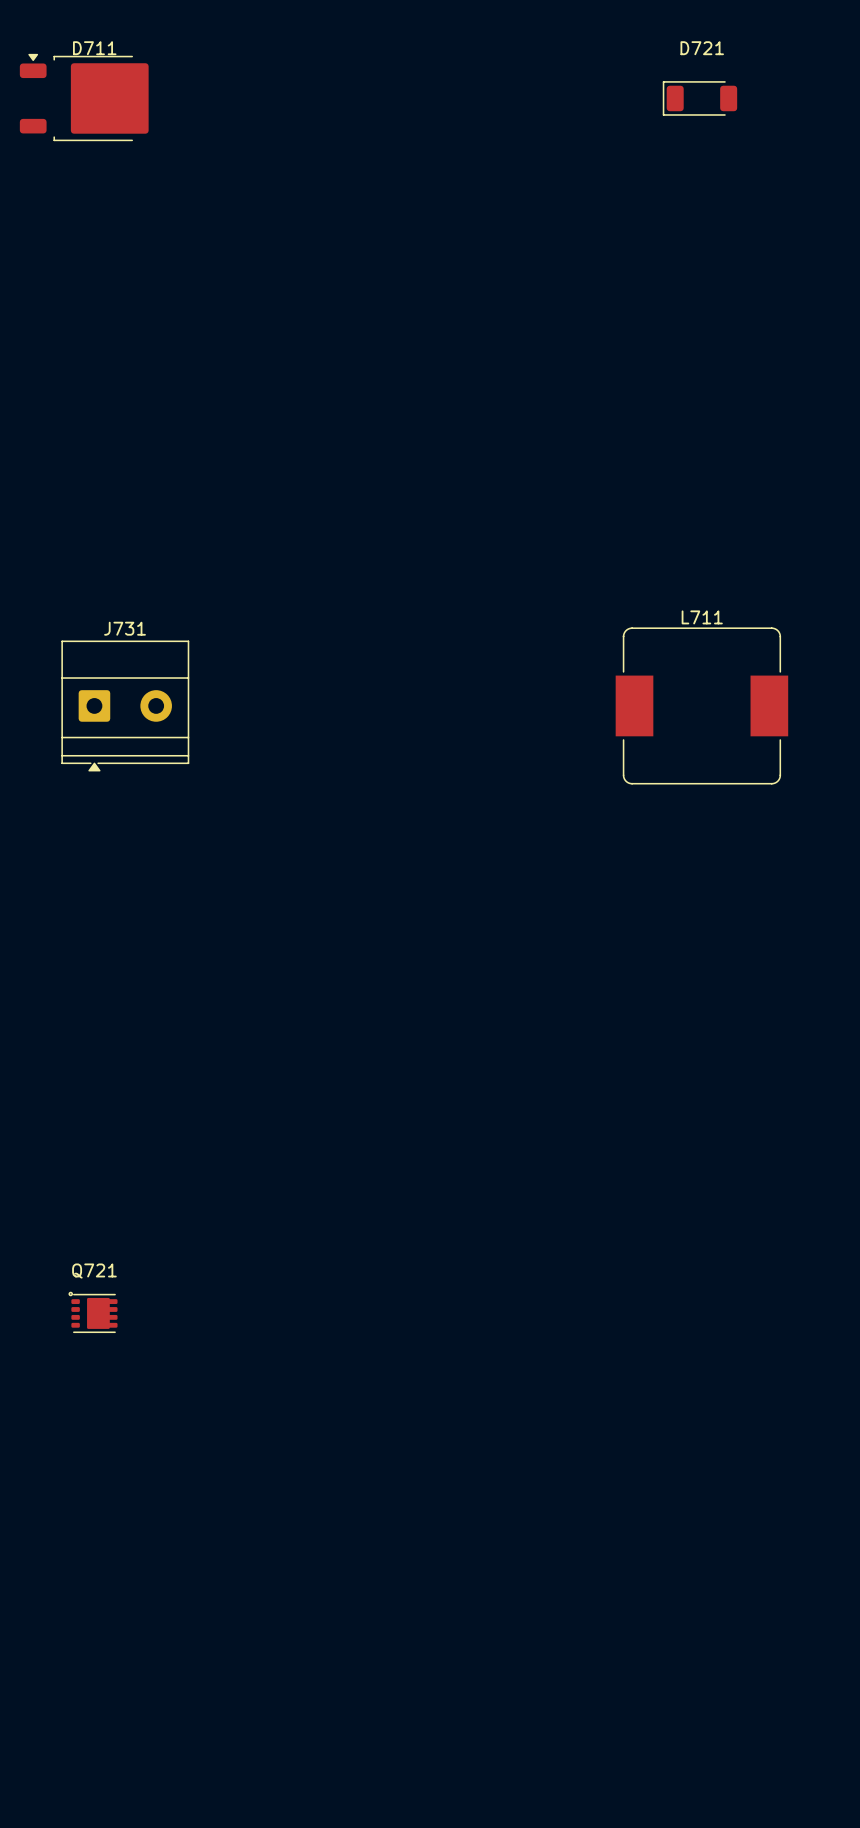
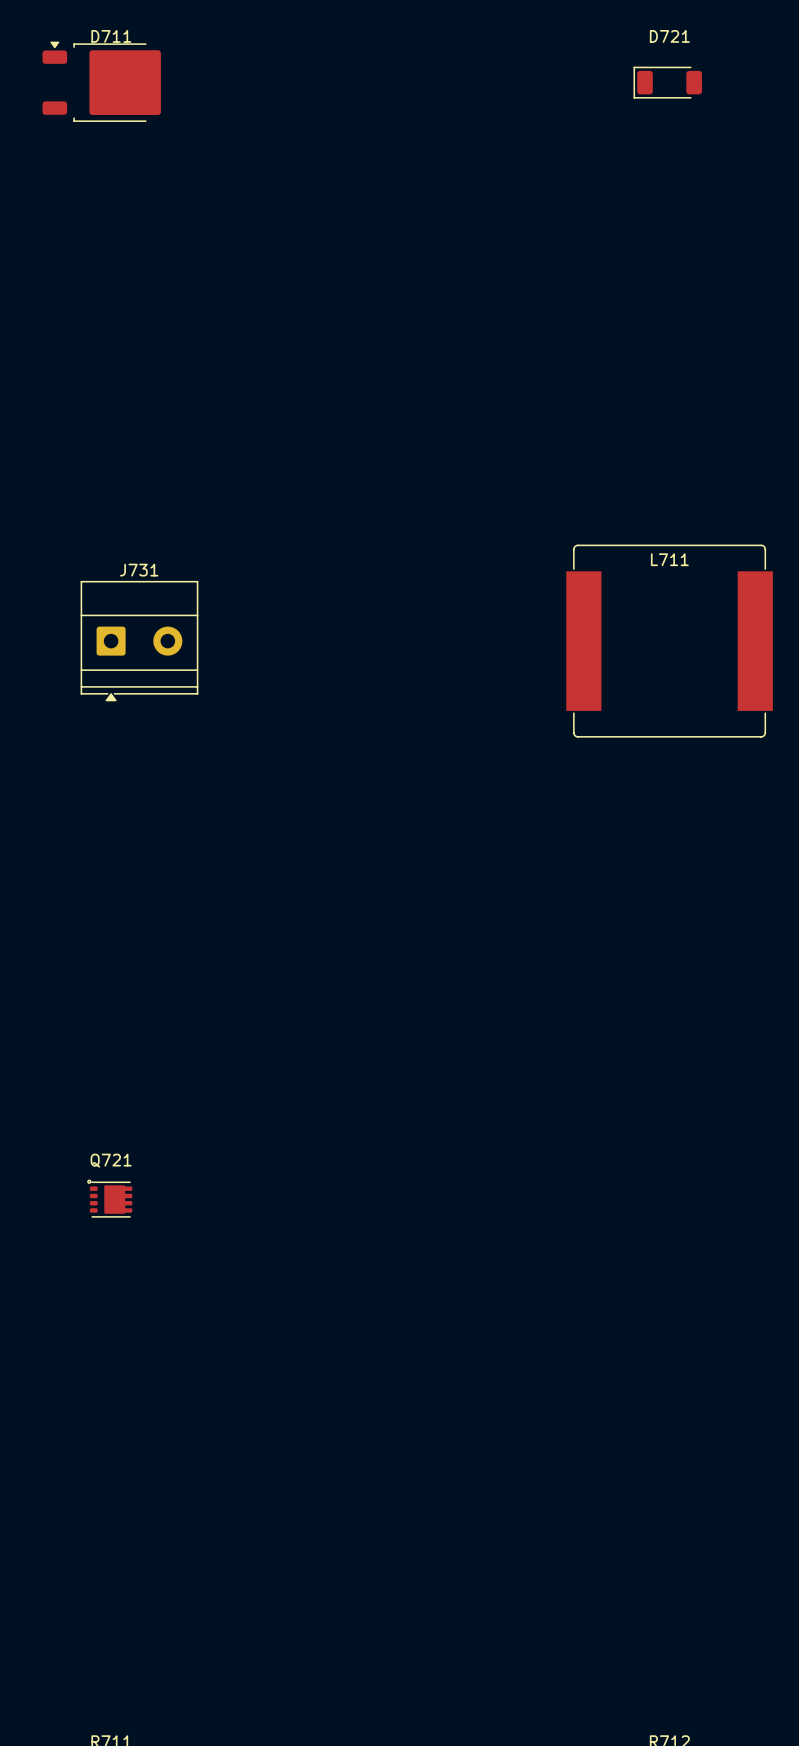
L711 footprint: [615, 627, 789, 785] -> [566, 544, 773, 738]

